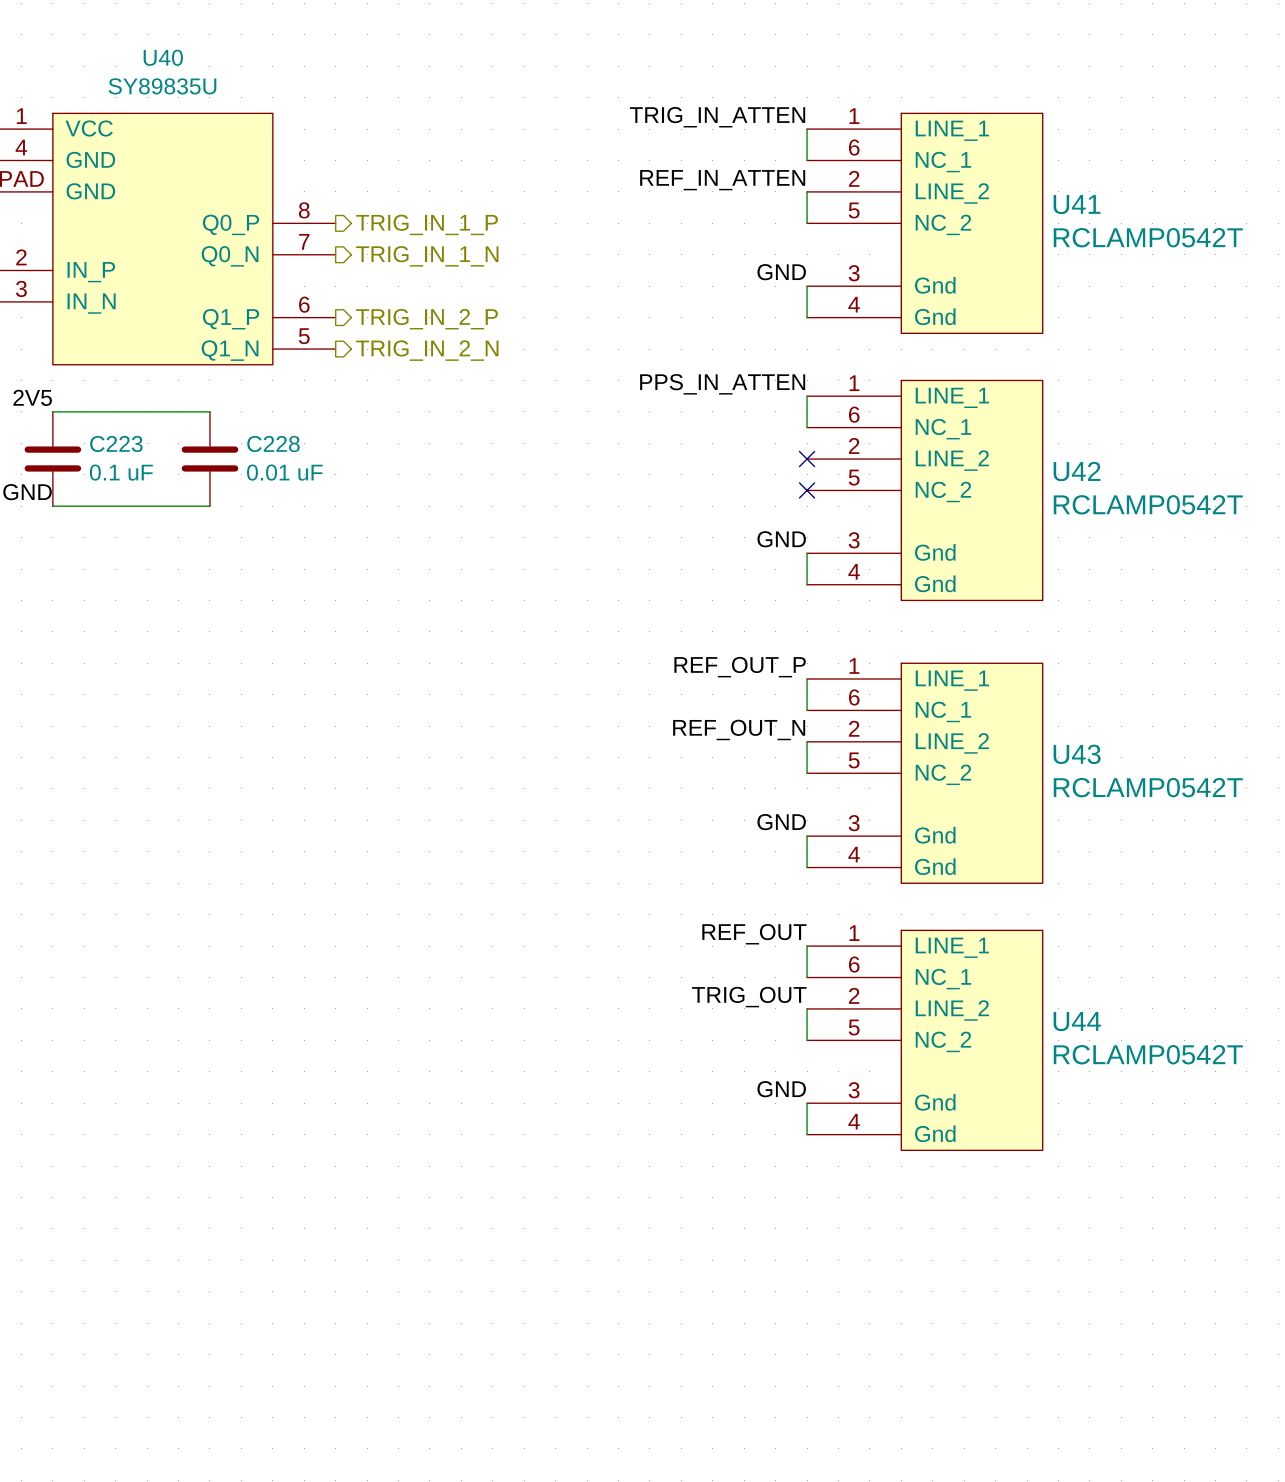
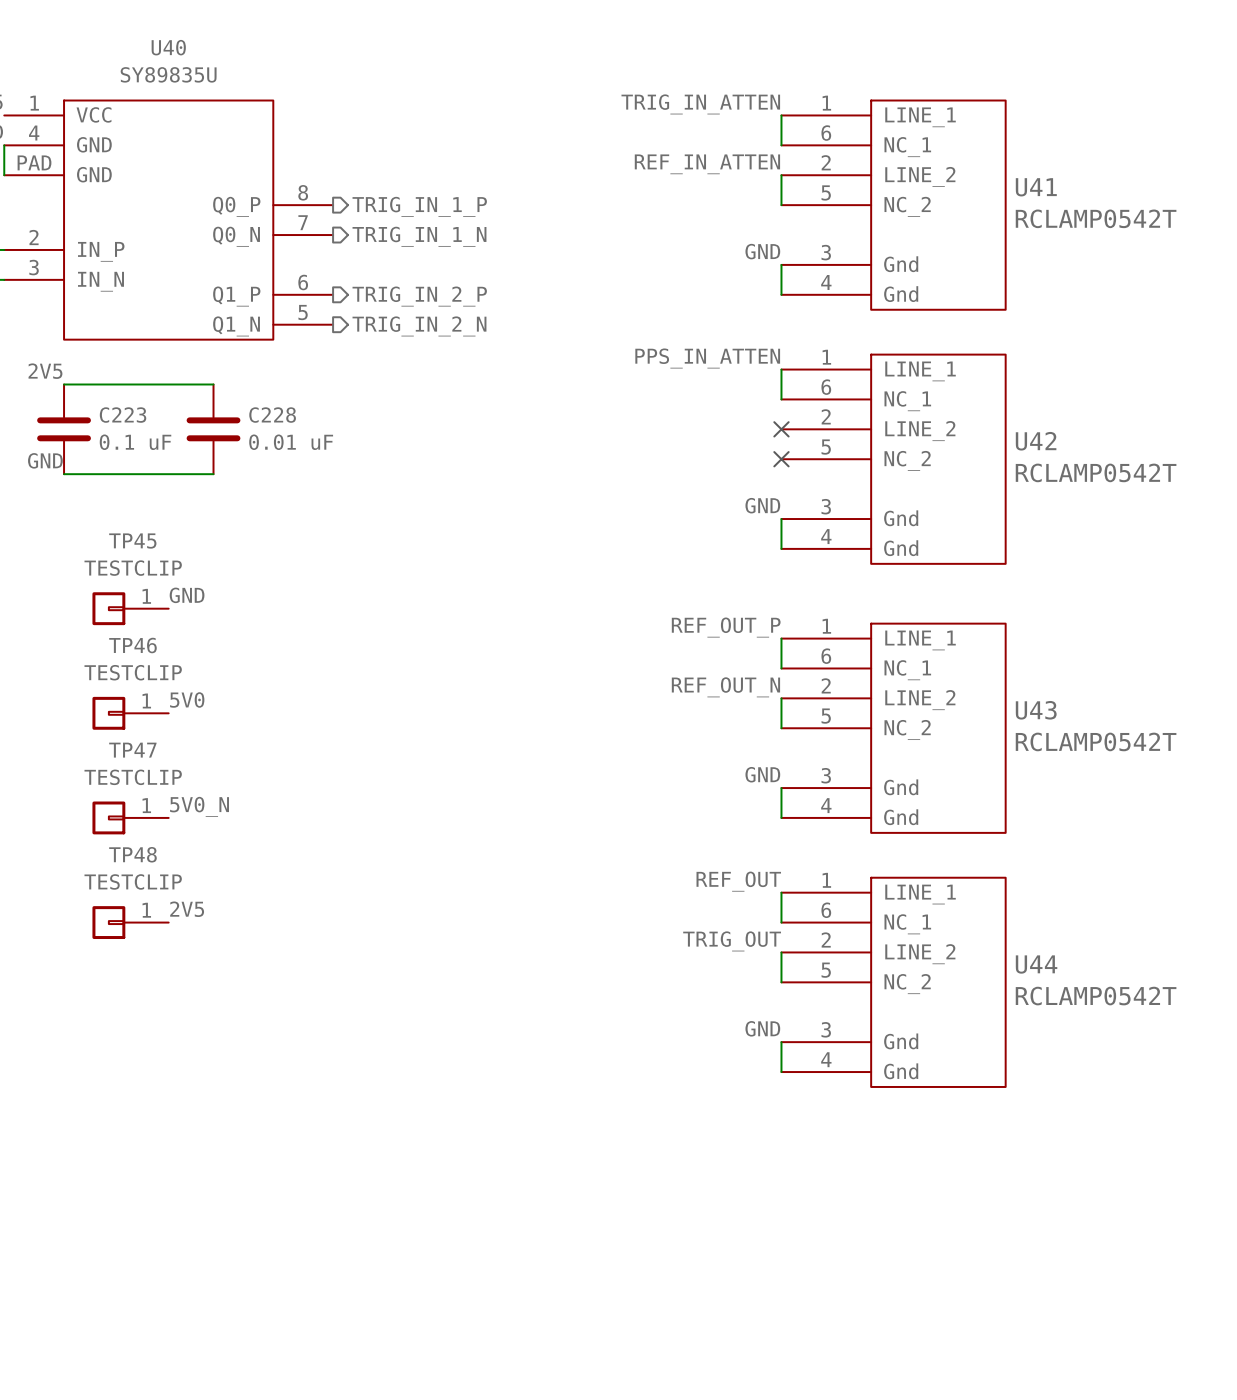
label: none -> GND (187, 595)
TP45: none -> TESTCLIP (130, 608)
label: none -> 5V0 (187, 699)
TP46: none -> TESTCLIP (130, 713)
label: none -> 5V0_N (199, 806)
TP47: none -> TESTCLIP (130, 817)
label: none -> 2V5 (187, 909)
TP48: none -> TESTCLIP (130, 922)

